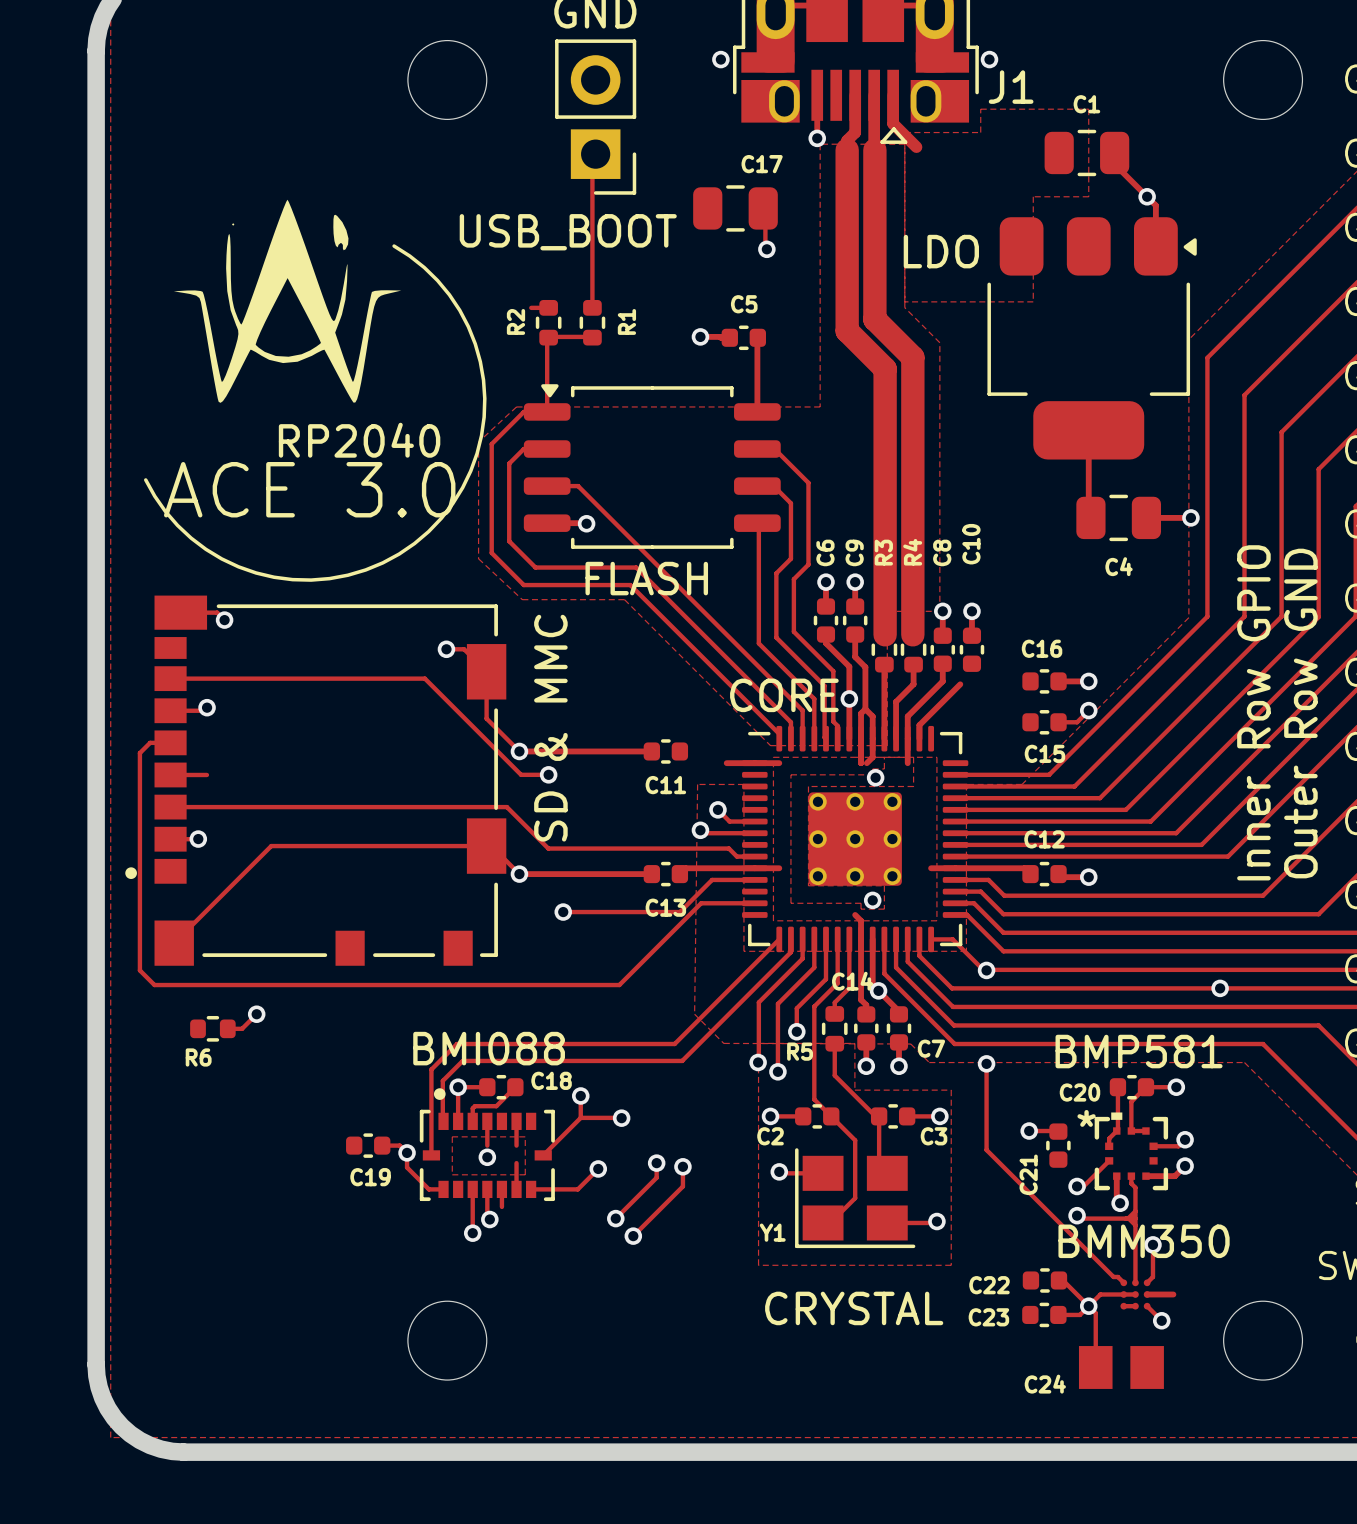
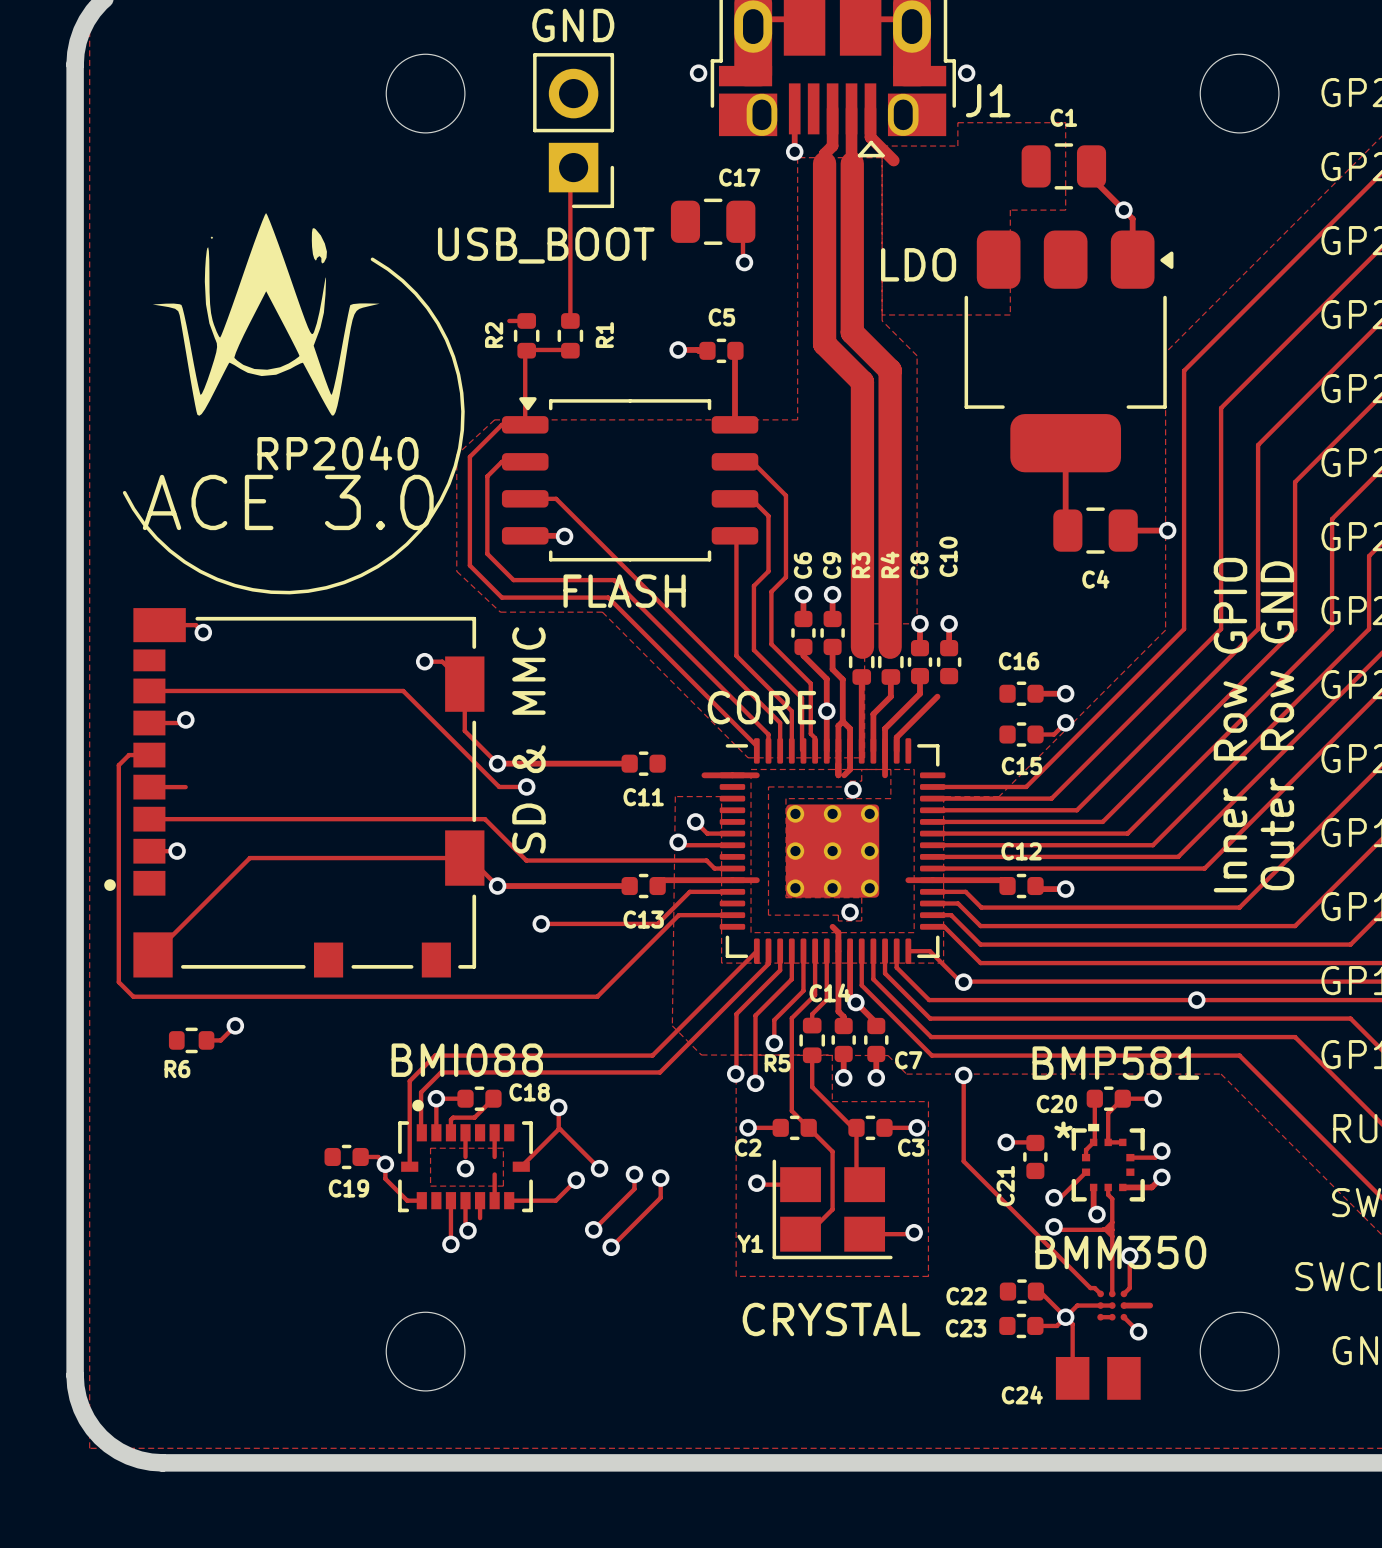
track: (582, 1117) (621, 1117) -> (560, 1129) (599, 1168)
via position: (621, 1118) -> (599, 1168)

